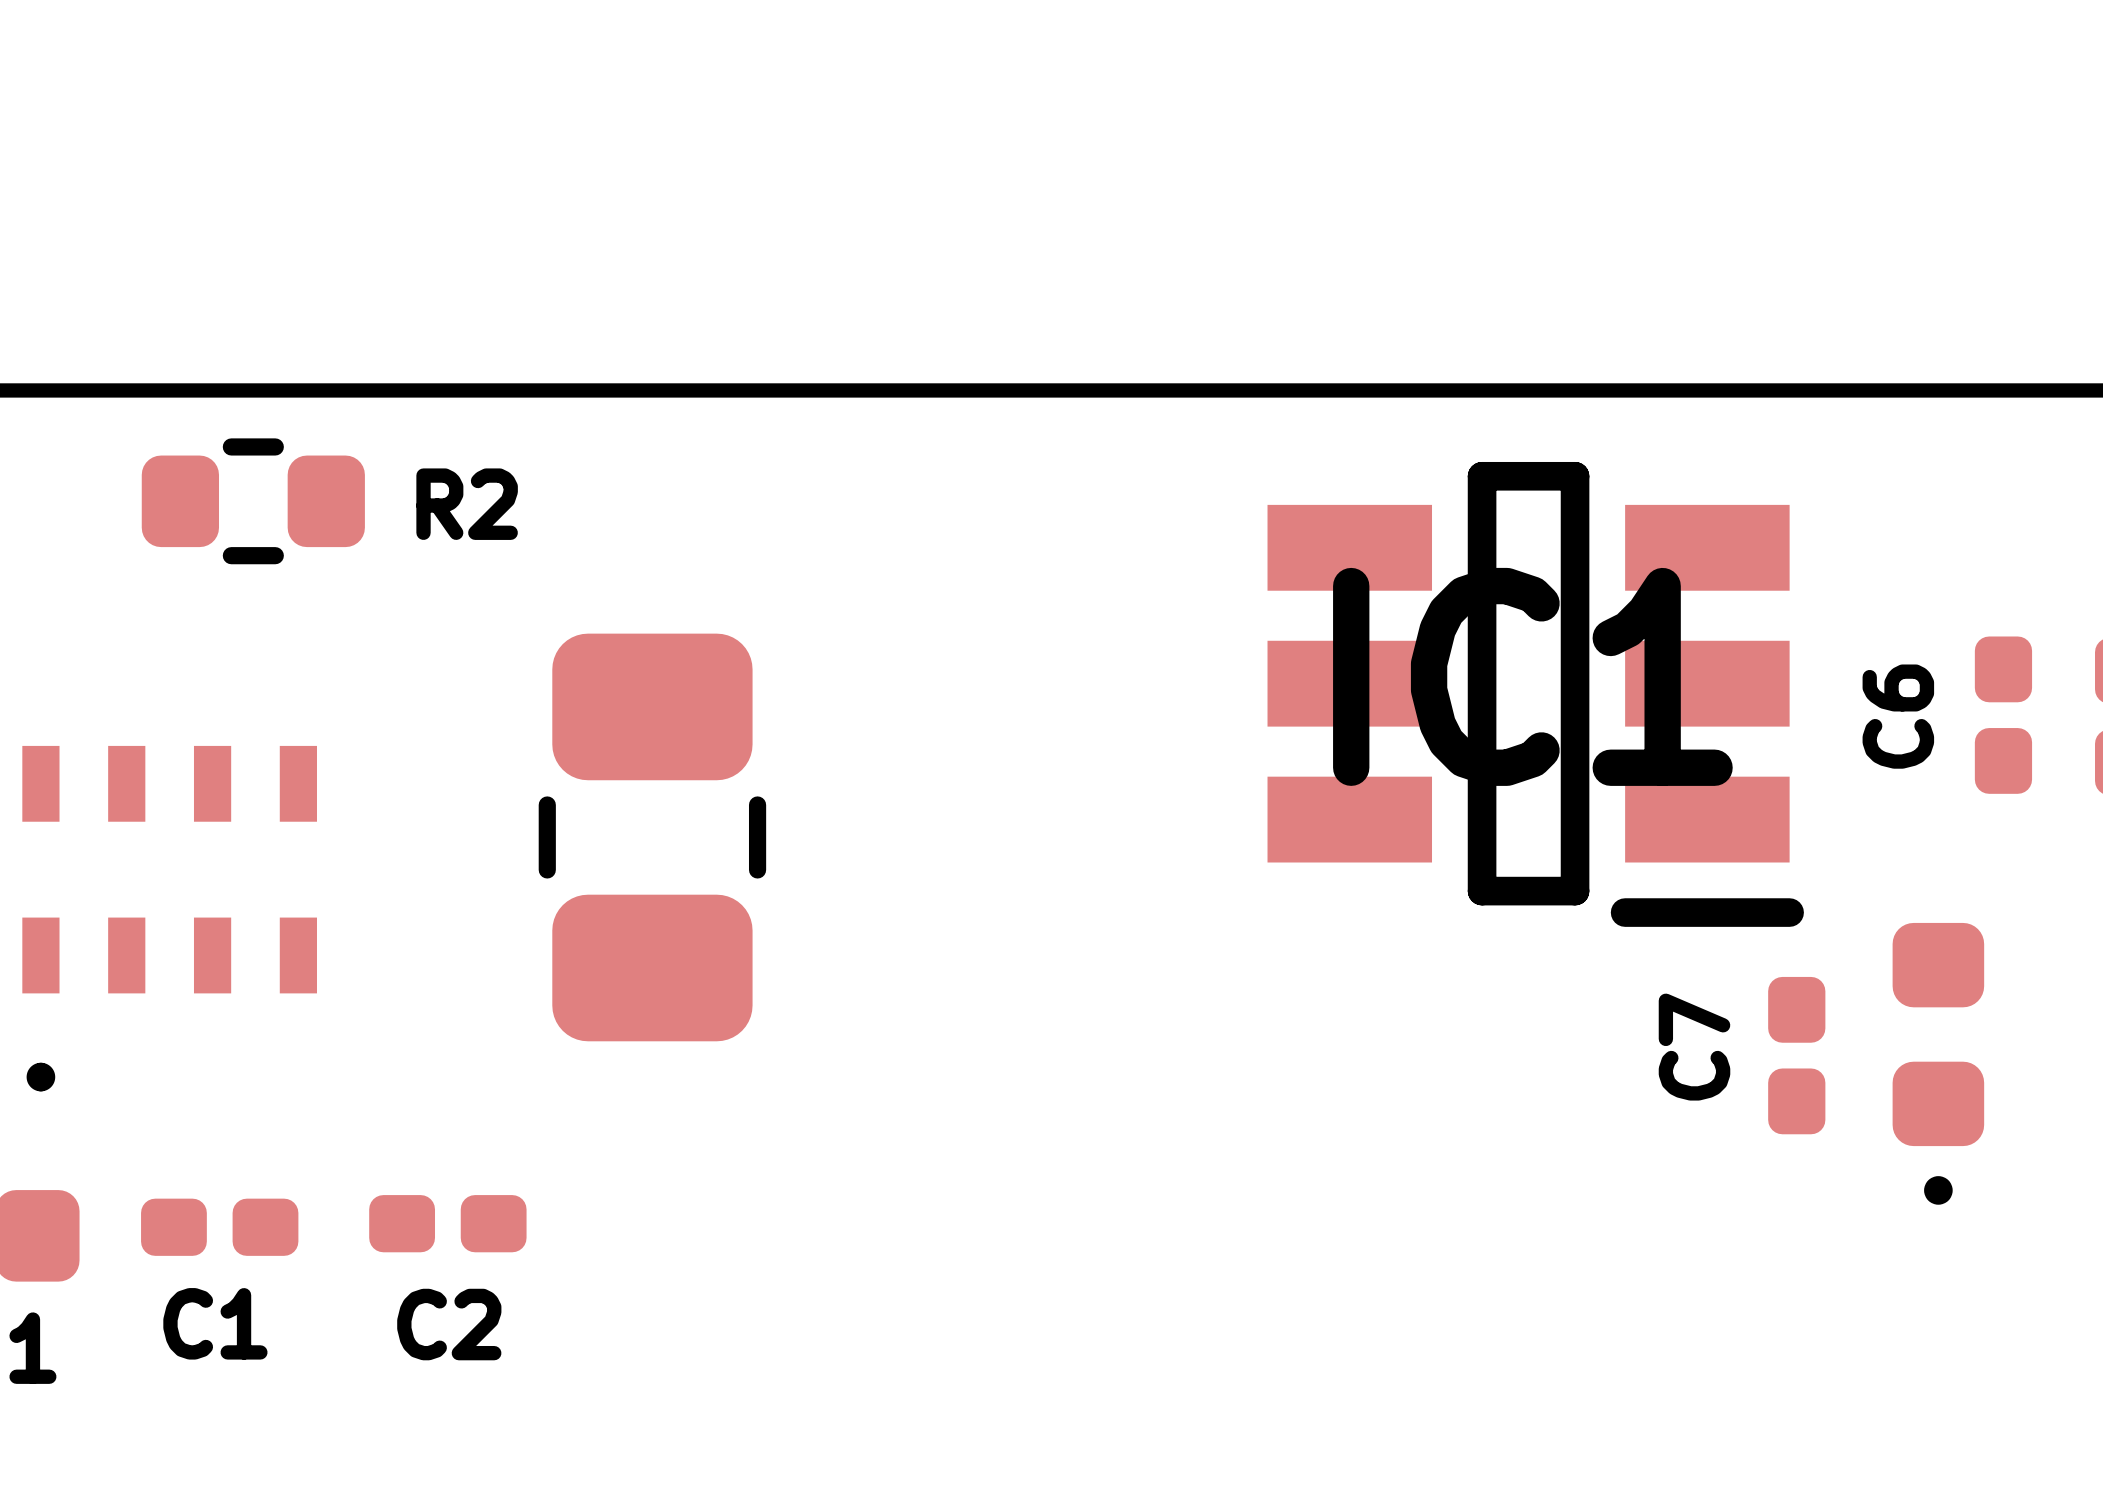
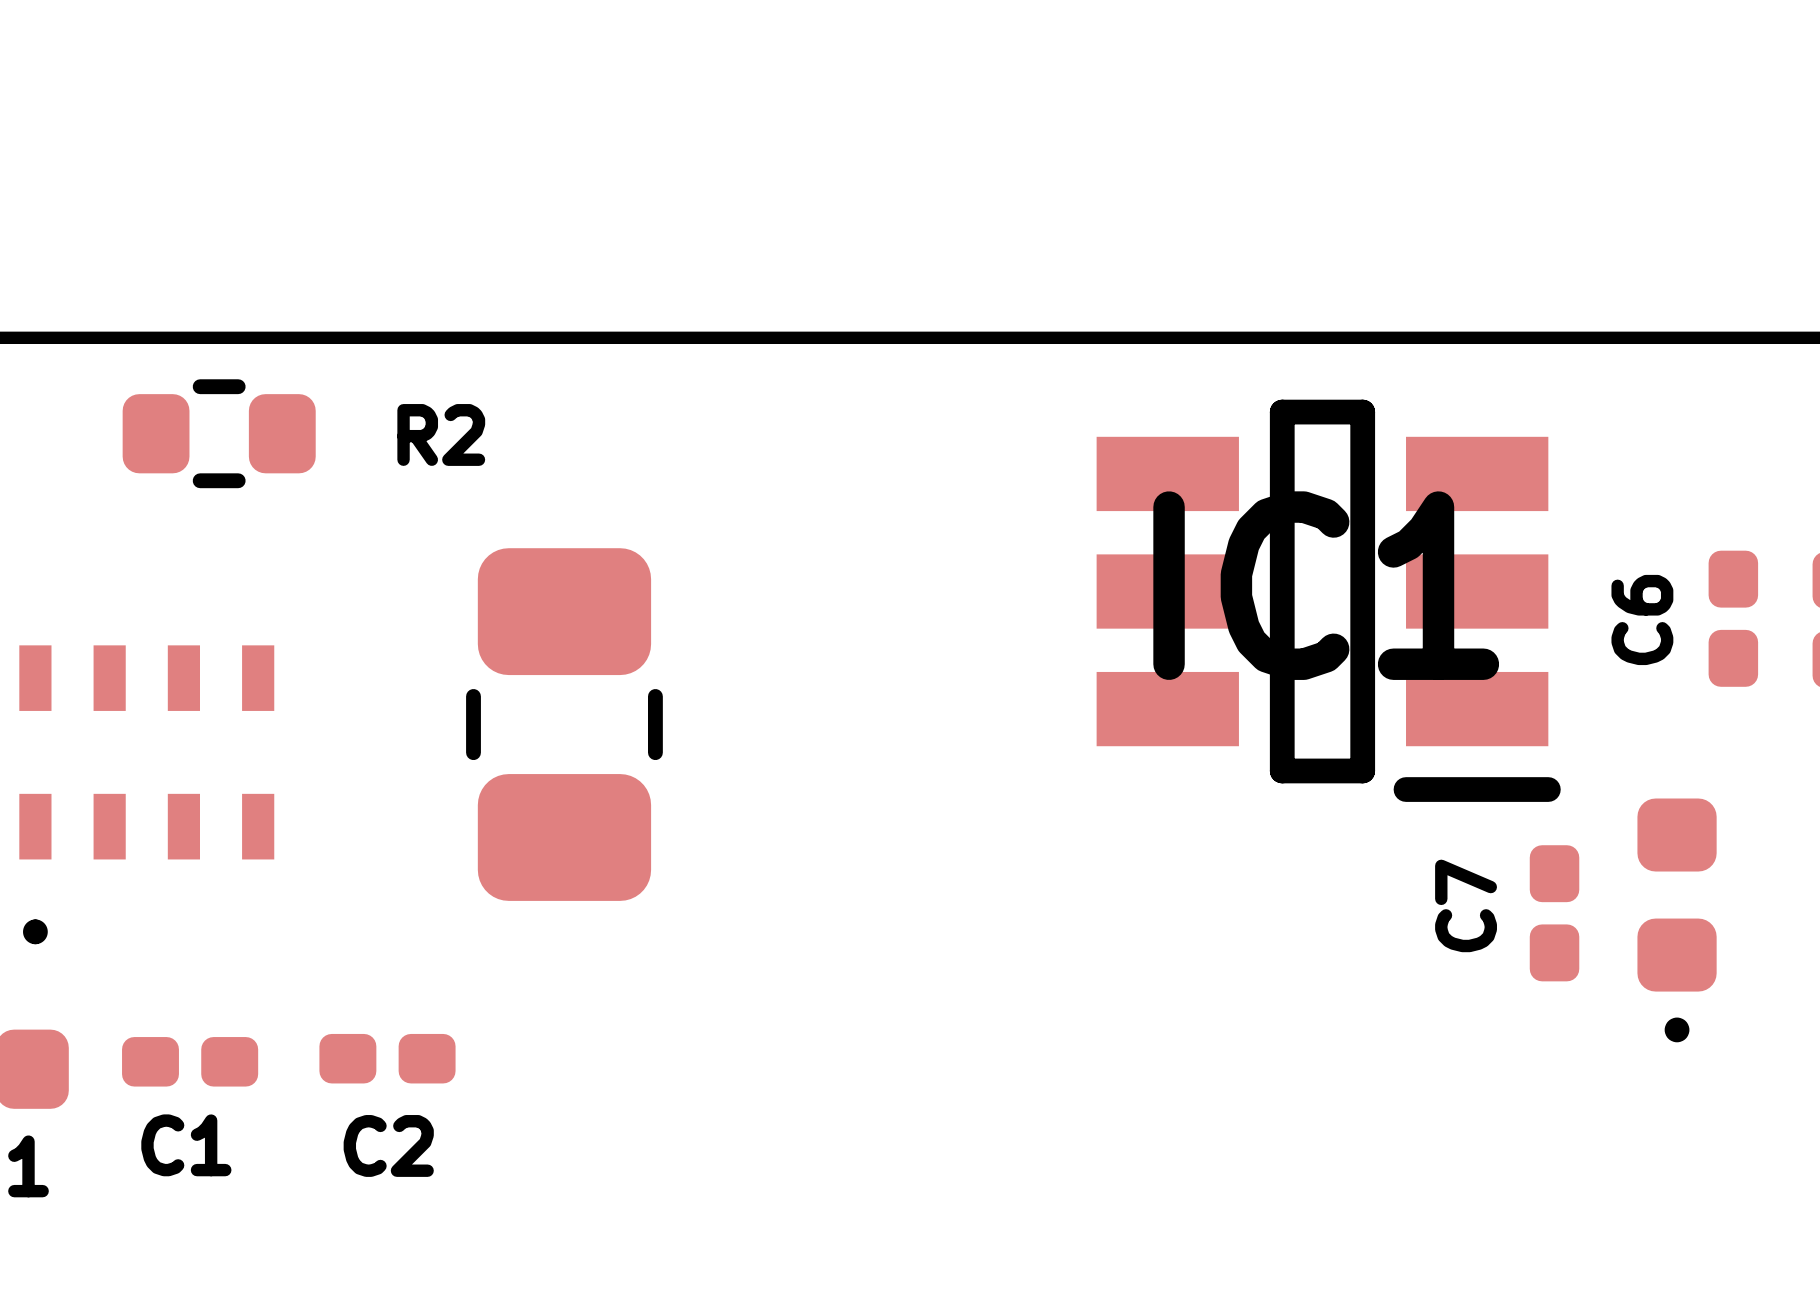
R2 name position: R2 (467, 504) -> R2 (441, 434)

